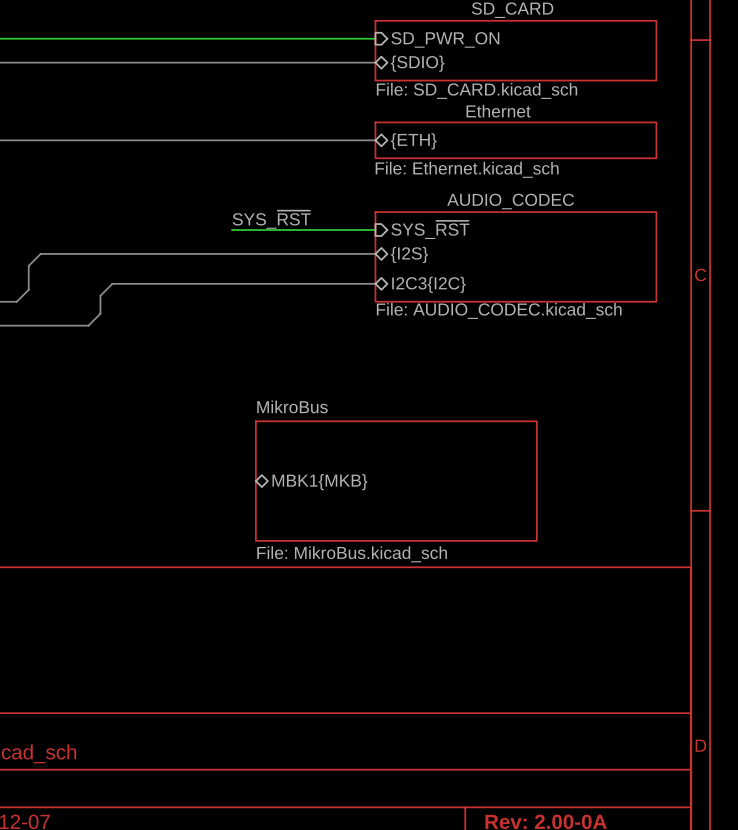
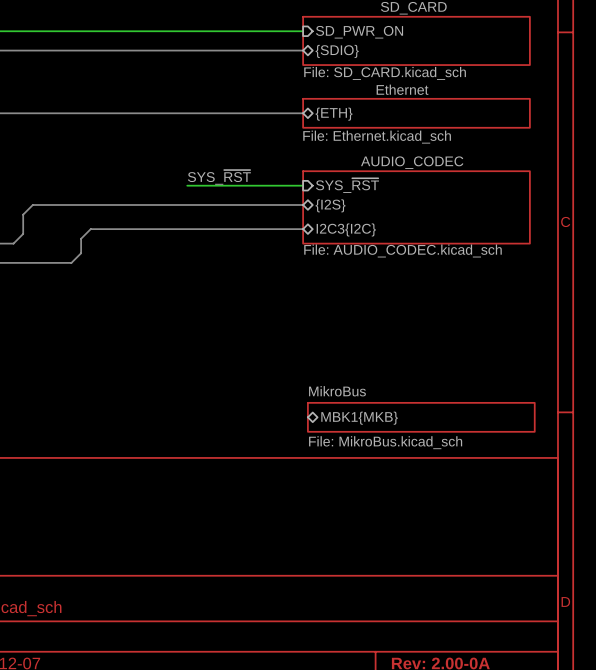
sheet MikroBus: File: MikroBus.kicad_sch (396, 481) -> none
sheet pin position: MBK1{MKB} (319, 482) -> MBK1{MKB} (359, 418)
sheet MikroBus: none -> File: MikroBus.kicad_sch (421, 417)

